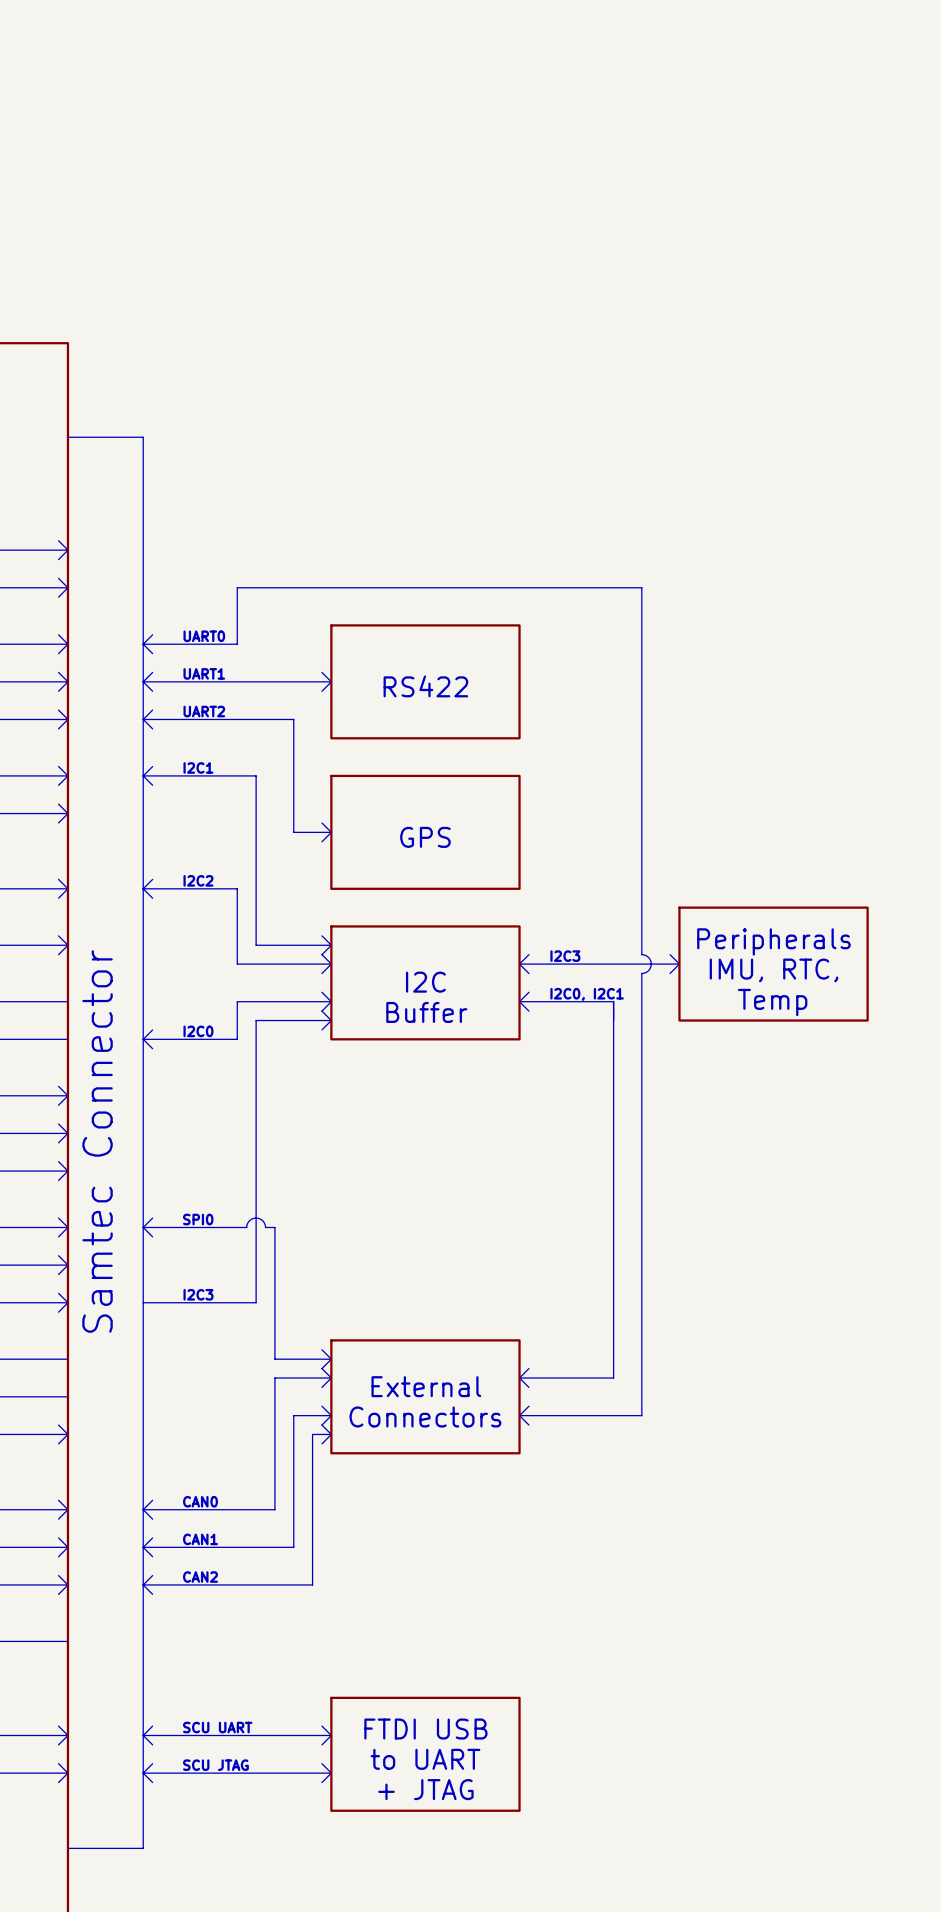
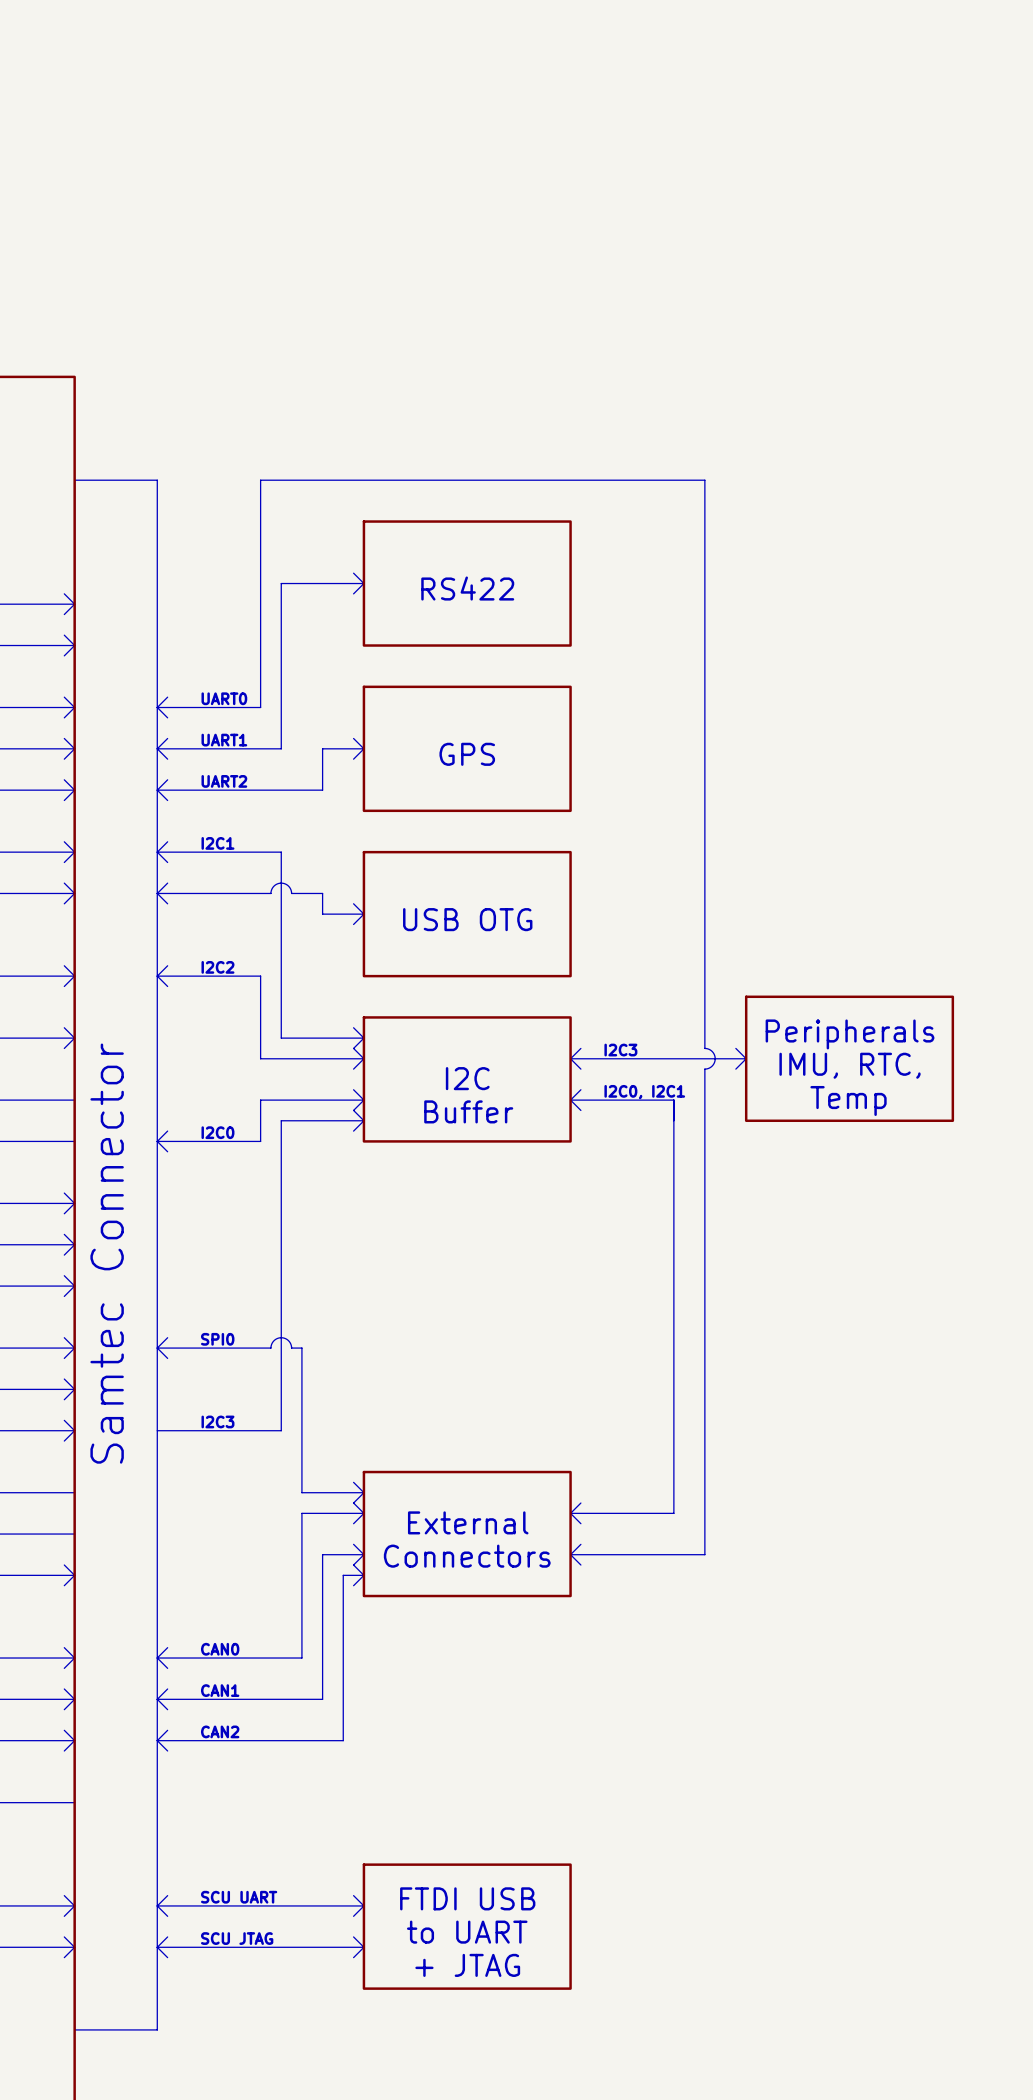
line: none -> (353, 573) (363, 583)
line: none -> (363, 583) (281, 583) (281, 748)
line: none -> (363, 583) (353, 593)
sheet: none -> (467, 583)
text: none -> RS422 (467, 588)
line: (237, 587) (641, 587) -> (260, 645) (260, 480) (704, 480) (704, 645)
line: (256, 681) (293, 681) -> (322, 790) (322, 748)
text: RS422 (425, 686) -> GPS (467, 754)
line: (293, 719) (293, 813) -> (157, 893) (270, 893) (273, 886) (281, 883) (288, 886) (291, 893) (322, 893)
line: none -> (167, 883) (157, 893)
line: none -> (157, 893) (167, 903)
text: GPS (425, 837) -> USB OTG (467, 919)

